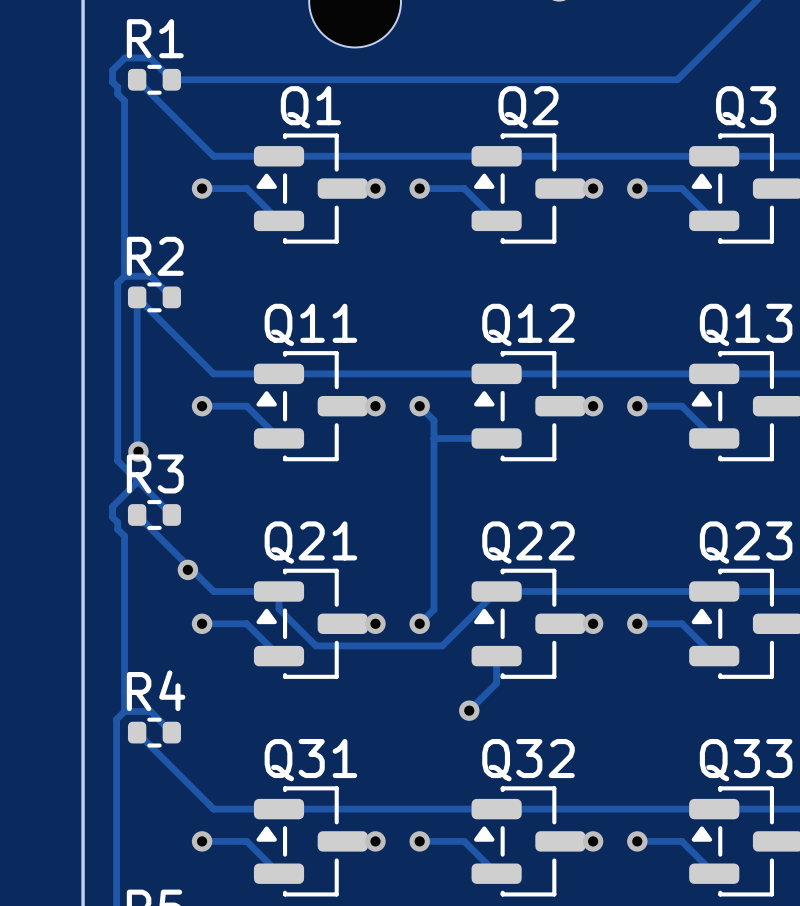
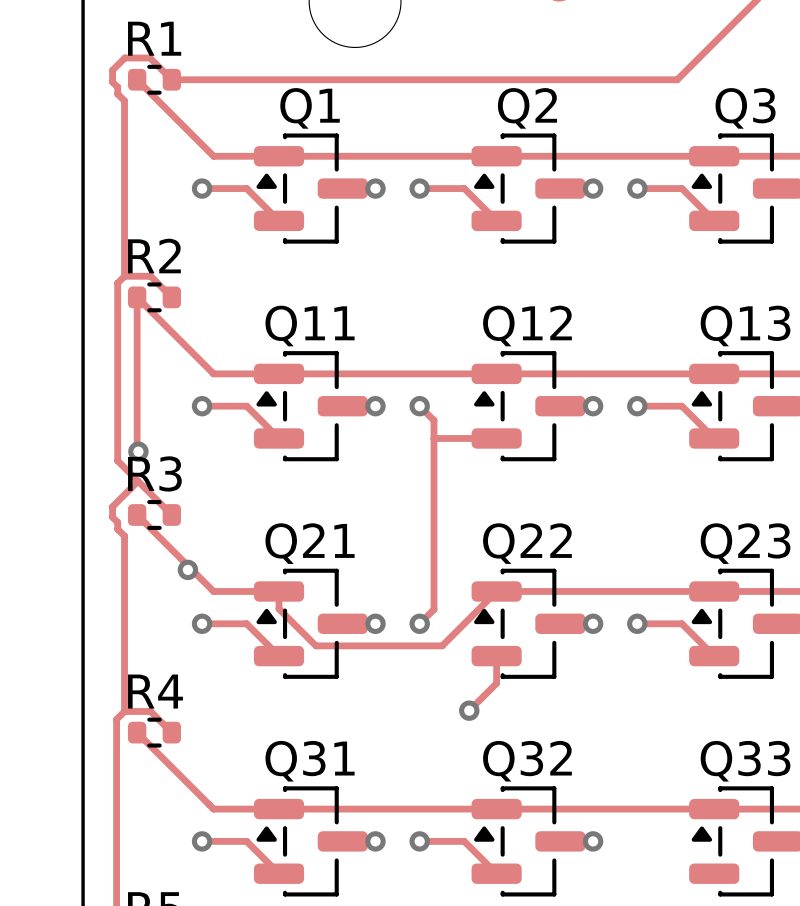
track: (637, 841) (681, 841) (714, 873) -> none
via: (637, 841) -> none

